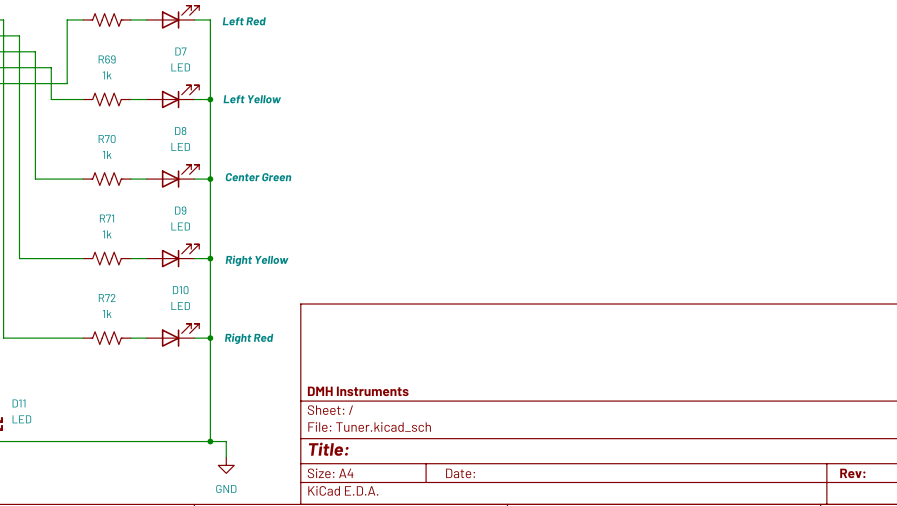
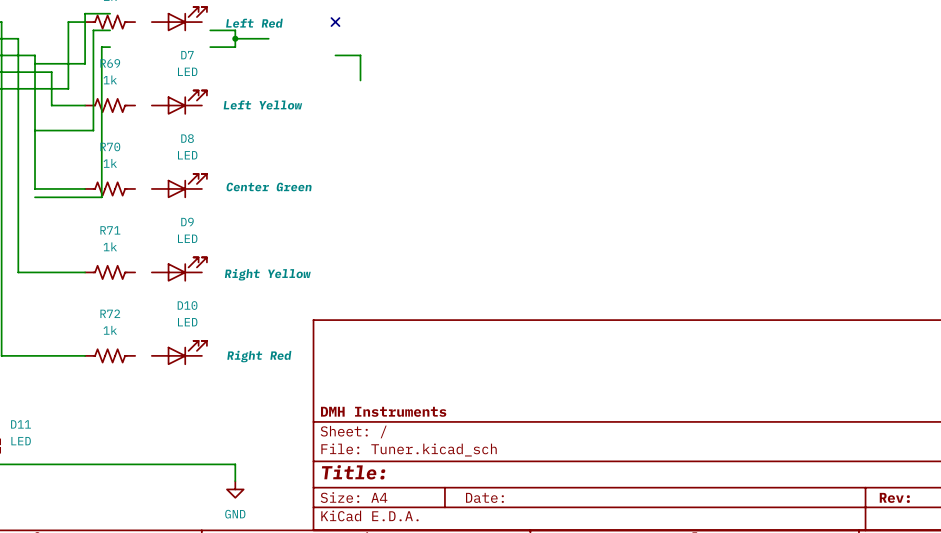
wire: none -> (110, 13) (85, 13) (85, 63) (35, 63)
wire: (130, 19) (146, 19) -> none
wire: (194, 19) (210, 19) (210, 441) -> none
no-connect mark: none -> (335, 22)
wire: none -> (110, 30) (93, 30) (93, 130) (35, 130)
wire: none -> (210, 30) (235, 30) (235, 47) (210, 47)
wire: none -> (235, 38) (268, 38)
junction: none -> (235, 38)
wire: none -> (110, 47) (101, 47) (101, 197) (35, 197)
wire: none -> (335, 55) (360, 55) (360, 80)
wire: (130, 99) (146, 99) -> none
wire: (194, 99) (210, 99) -> none
junction: (210, 99) -> none
wire: (130, 179) (146, 179) -> none
wire: (194, 179) (210, 179) -> none
junction: (210, 179) -> none
wire: (130, 258) (146, 258) -> none
wire: (194, 258) (210, 258) -> none
junction: (210, 258) -> none
wire: (130, 338) (146, 338) -> none
wire: (194, 338) (210, 338) -> none
junction: (210, 338) -> none
junction: (210, 441) -> none

